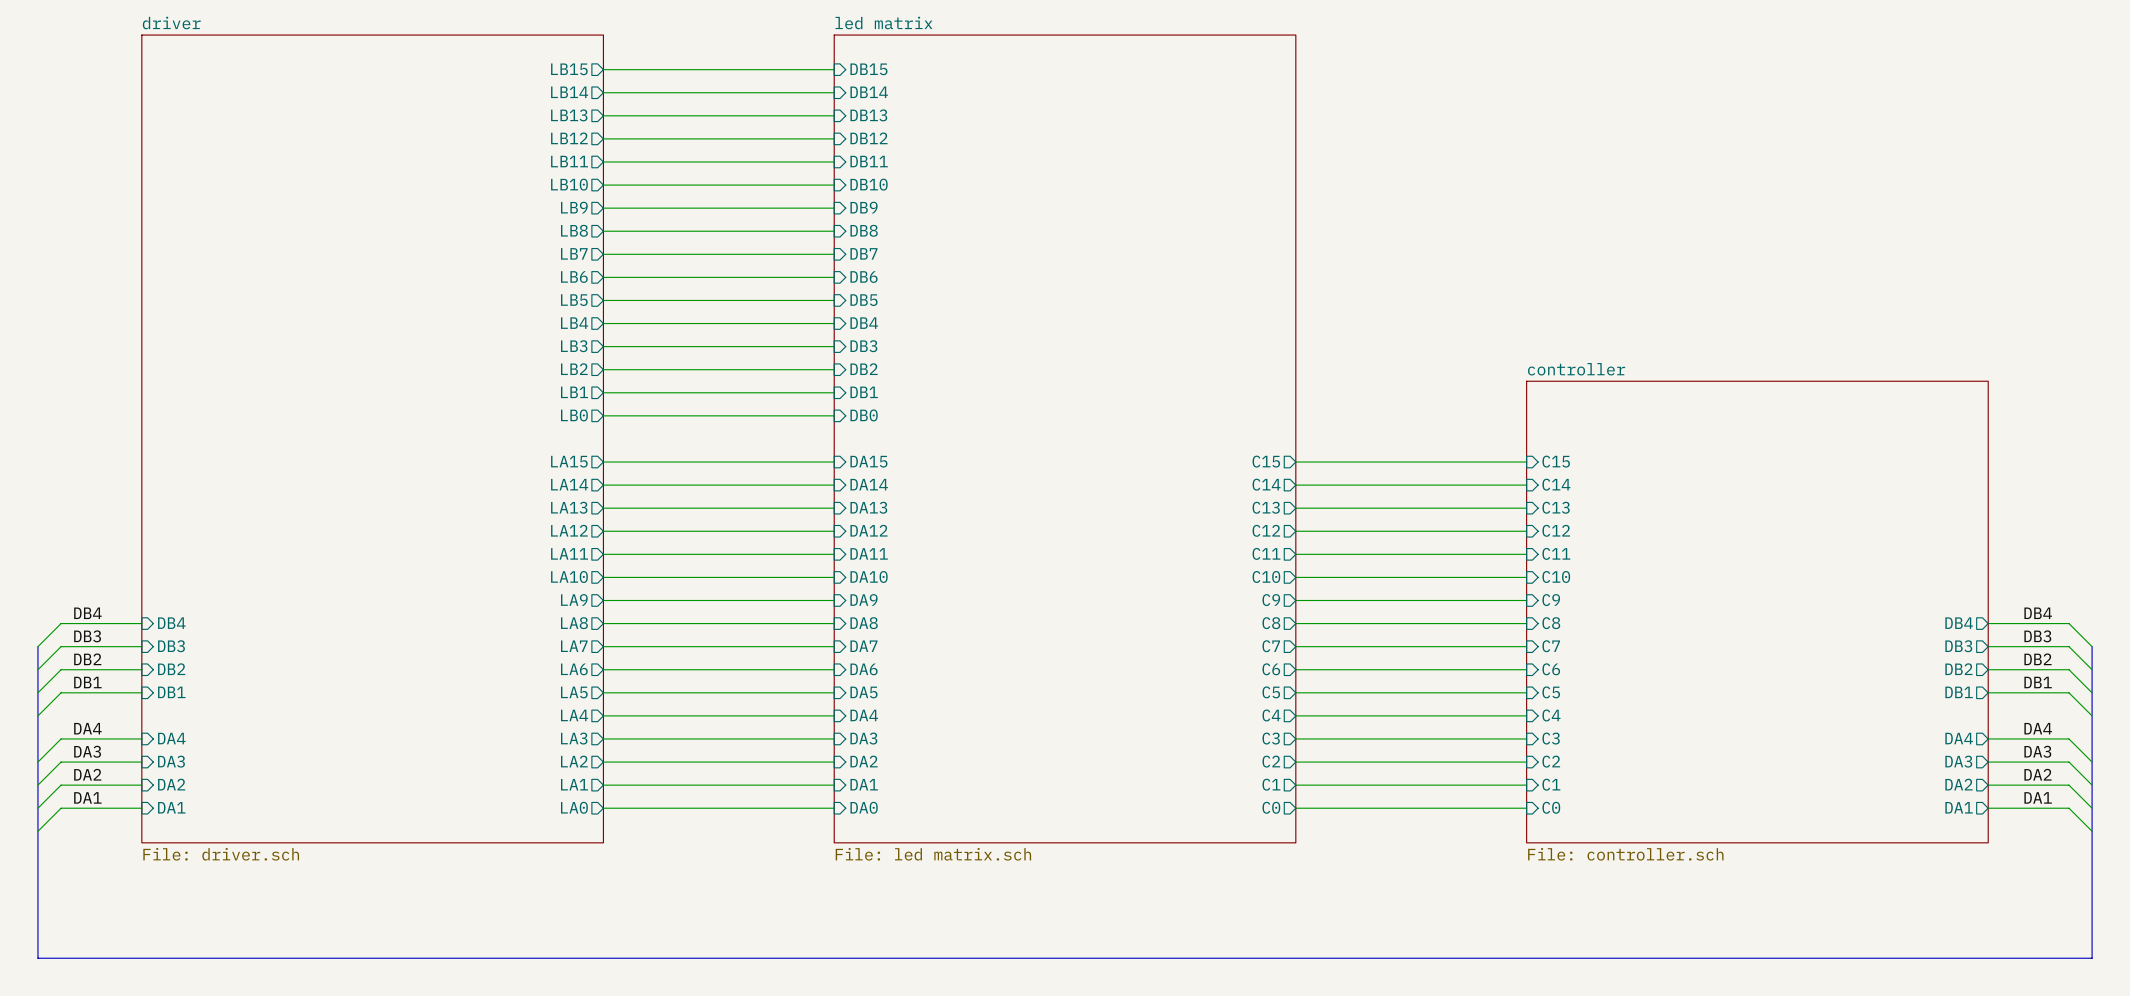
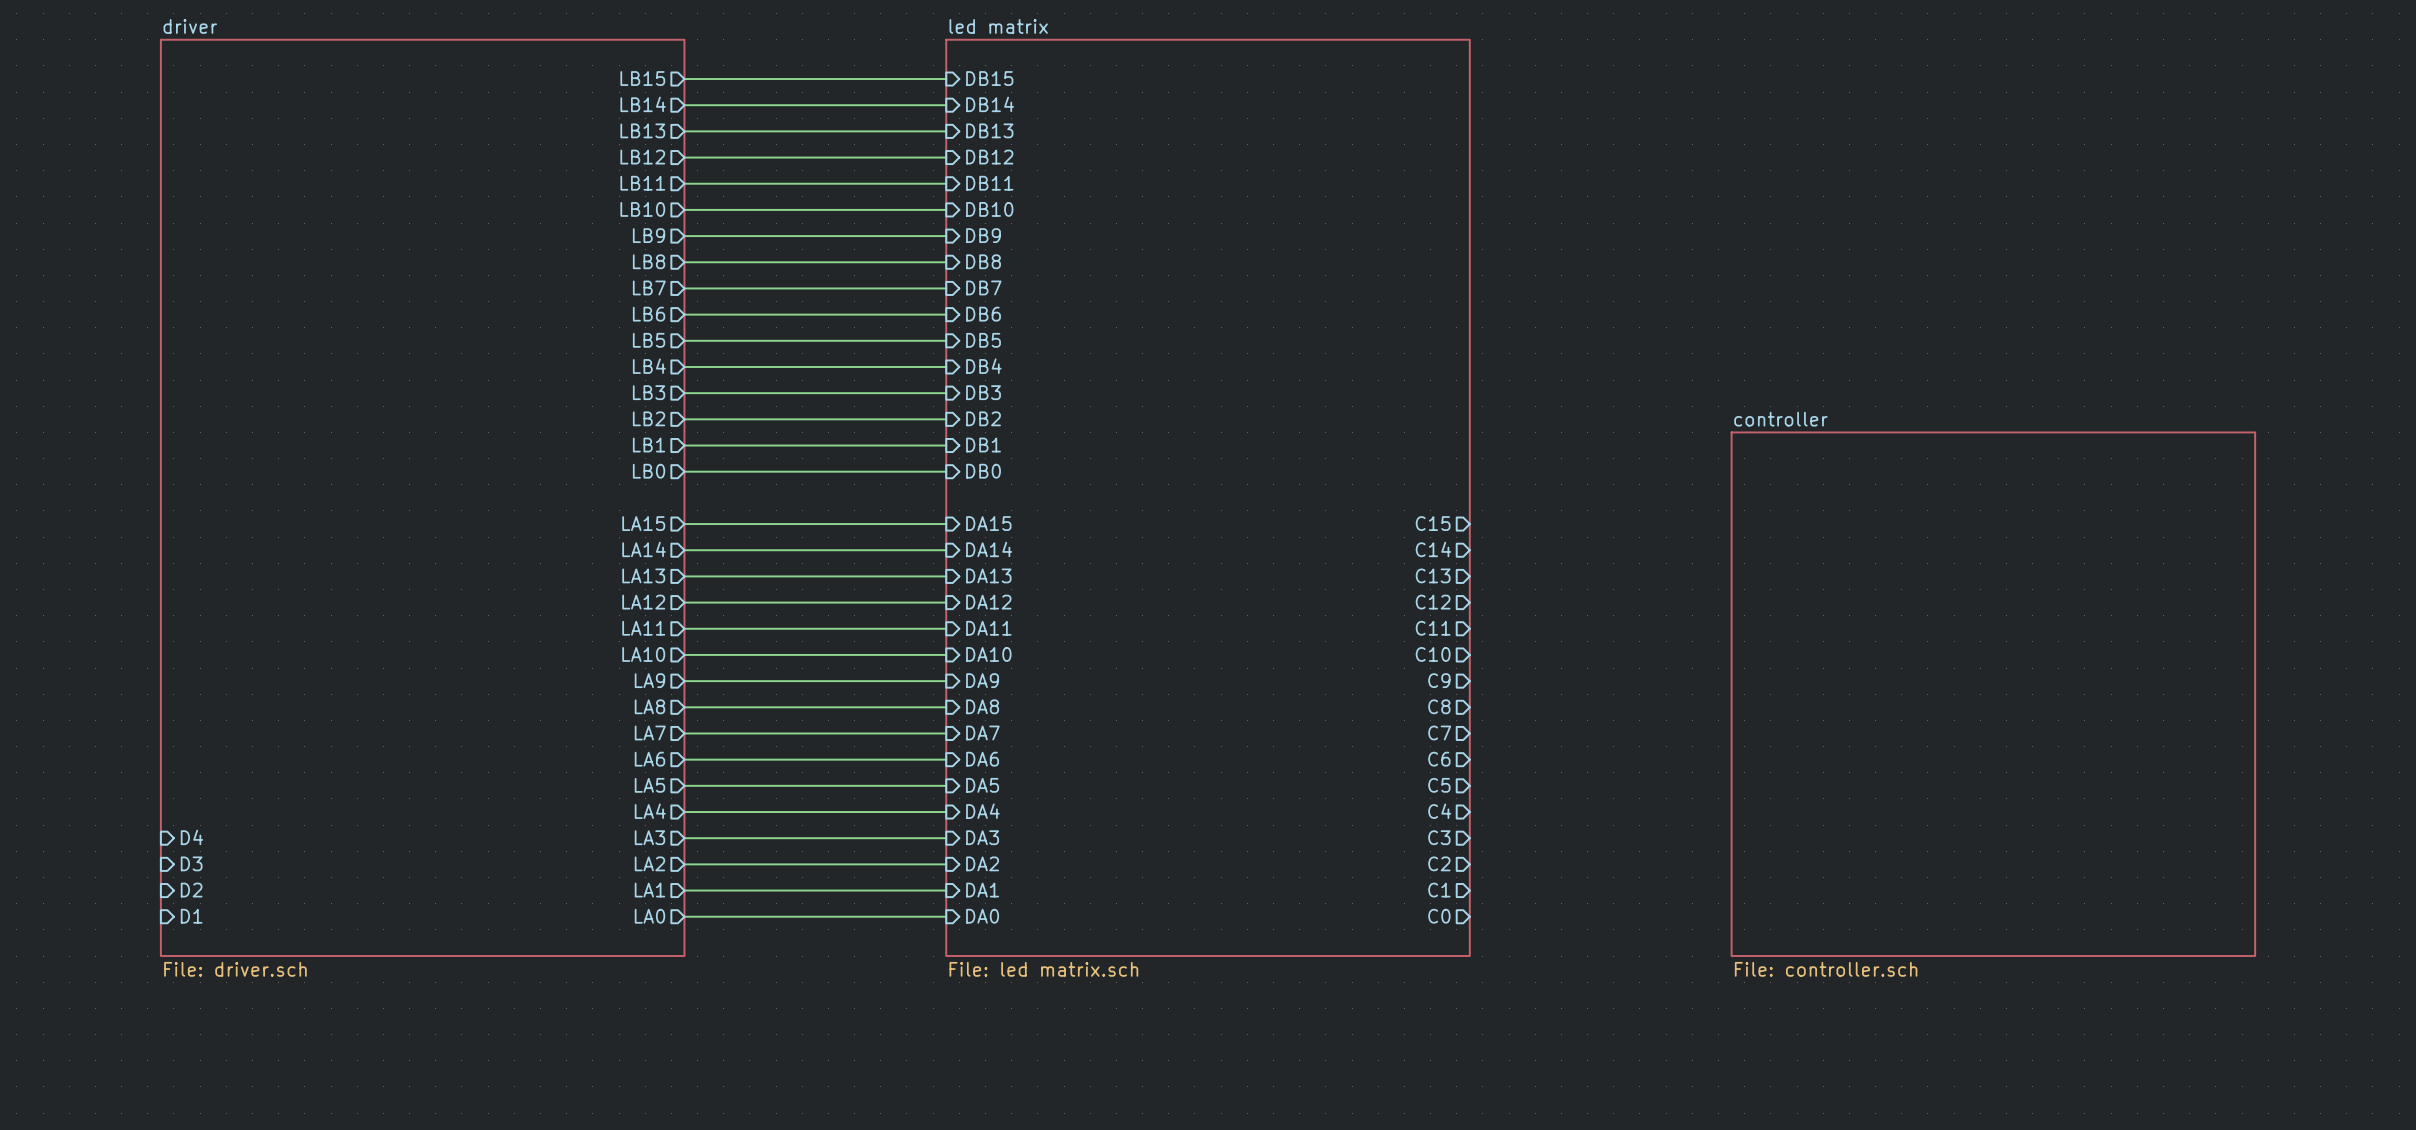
sheet pin: C15 (1556, 461) -> none
wire: (1295, 462) (1526, 462) -> none
sheet pin: C14 (1556, 484) -> none
wire: (1295, 485) (1526, 485) -> none
sheet pin: C13 (1556, 507) -> none
wire: (1295, 508) (1526, 508) -> none
sheet pin: C12 (1556, 530) -> none
wire: (1295, 531) (1526, 531) -> none
sheet pin: C11 (1556, 553) -> none
wire: (1295, 554) (1526, 554) -> none
sheet pin: C10 (1556, 576) -> none
wire: (1295, 577) (1526, 577) -> none
wire: (1295, 600) (1526, 600) -> none
sheet pin: C9 (1551, 600) -> none
label: DB4 (87, 613) -> none
label: DB4 (2038, 613) -> none
wire: (141, 623) (61, 623) (37, 646) -> none
sheet pin: DB4 (171, 623) -> none
wire: (1295, 623) (1526, 623) -> none
sheet pin: C8 (1551, 623) -> none
sheet pin: DB4 (1959, 623) -> none
wire: (1988, 623) (2068, 623) (2092, 646) -> none
label: DB3 (87, 636) -> none
label: DB3 (2037, 636) -> none
bus: (37, 646) (37, 958) (2092, 958) (2092, 646) -> none
wire: (141, 646) (61, 646) (37, 669) -> none
sheet pin: DB3 (171, 646) -> none
wire: (1295, 646) (1526, 646) -> none
sheet pin: C7 (1551, 646) -> none
sheet pin: DB3 (1958, 646) -> none
wire: (1988, 646) (2068, 646) (2092, 669) -> none
label: DB2 (87, 659) -> none
label: DB2 (2037, 659) -> none
wire: (141, 669) (61, 669) (37, 692) -> none
sheet pin: DB2 (171, 669) -> none
wire: (1295, 669) (1526, 669) -> none
sheet pin: C6 (1551, 669) -> none
sheet pin: DB2 (1958, 669) -> none
wire: (1988, 669) (2068, 669) (2092, 692) -> none
label: DB1 (87, 682) -> none
label: DB1 (2038, 682) -> none
wire: (141, 692) (61, 692) (37, 715) -> none
sheet pin: DB1 (171, 692) -> none
wire: (1295, 692) (1526, 692) -> none
sheet pin: C5 (1551, 692) -> none
sheet pin: DB1 (1959, 692) -> none
wire: (1988, 692) (2068, 692) (2092, 715) -> none
wire: (1295, 715) (1526, 715) -> none
sheet pin: C4 (1551, 715) -> none
label: DA4 (87, 728) -> none
label: DA4 (2038, 728) -> none
wire: (141, 738) (61, 738) (37, 762) -> none
sheet pin: DA4 (171, 738) -> D4 (191, 837)
wire: (1295, 738) (1526, 738) -> none
sheet pin: C3 (1551, 738) -> none
sheet pin: DA4 (1959, 738) -> none
wire: (1988, 738) (2068, 738) (2092, 762) -> none
label: DA3 (87, 751) -> none
label: DA3 (2037, 751) -> none
sheet pin: DA3 (171, 761) -> D3 (191, 863)
sheet pin: C2 (1551, 761) -> none
sheet pin: DA3 (1958, 761) -> none
wire: (141, 762) (61, 762) (37, 785) -> none
wire: (1295, 762) (1526, 762) -> none
wire: (1988, 762) (2068, 762) (2092, 785) -> none
label: DA2 (87, 774) -> none
label: DA2 (2037, 774) -> none
sheet pin: DA2 (171, 784) -> D2 (191, 890)
sheet pin: C1 (1551, 784) -> none
sheet pin: DA2 (1958, 784) -> none
wire: (141, 785) (61, 785) (37, 808) -> none
wire: (1295, 785) (1526, 785) -> none
wire: (1988, 785) (2068, 785) (2092, 808) -> none
label: DA1 (87, 797) -> none
label: DA1 (2038, 797) -> none
sheet pin: DA1 (171, 807) -> D1 (191, 916)
sheet pin: C0 (1551, 807) -> none
sheet pin: DA1 (1959, 807) -> none
wire: (141, 808) (61, 808) (37, 831) -> none
wire: (1295, 808) (1526, 808) -> none
wire: (1988, 808) (2068, 808) (2092, 831) -> none

